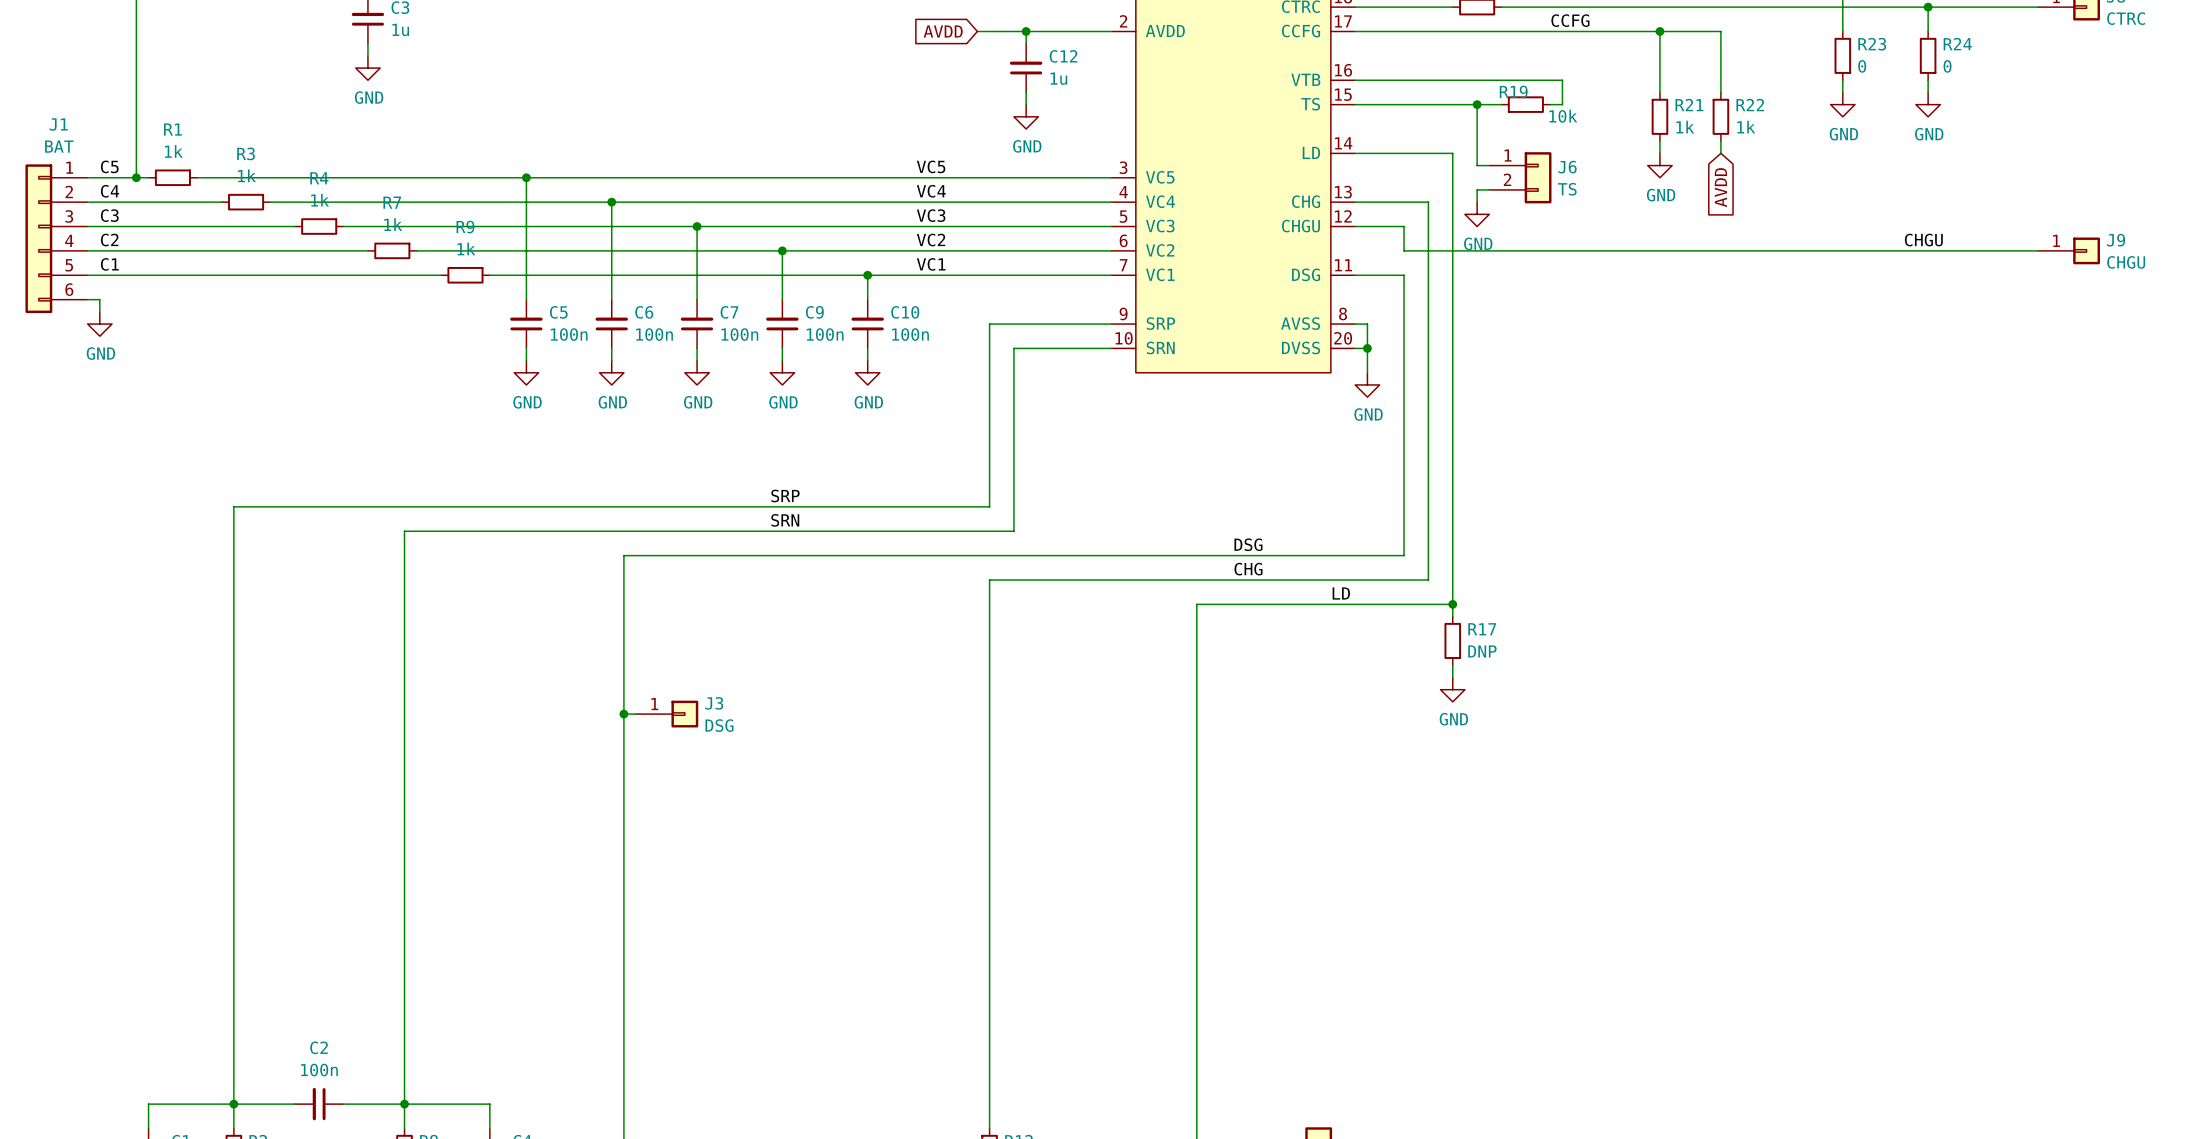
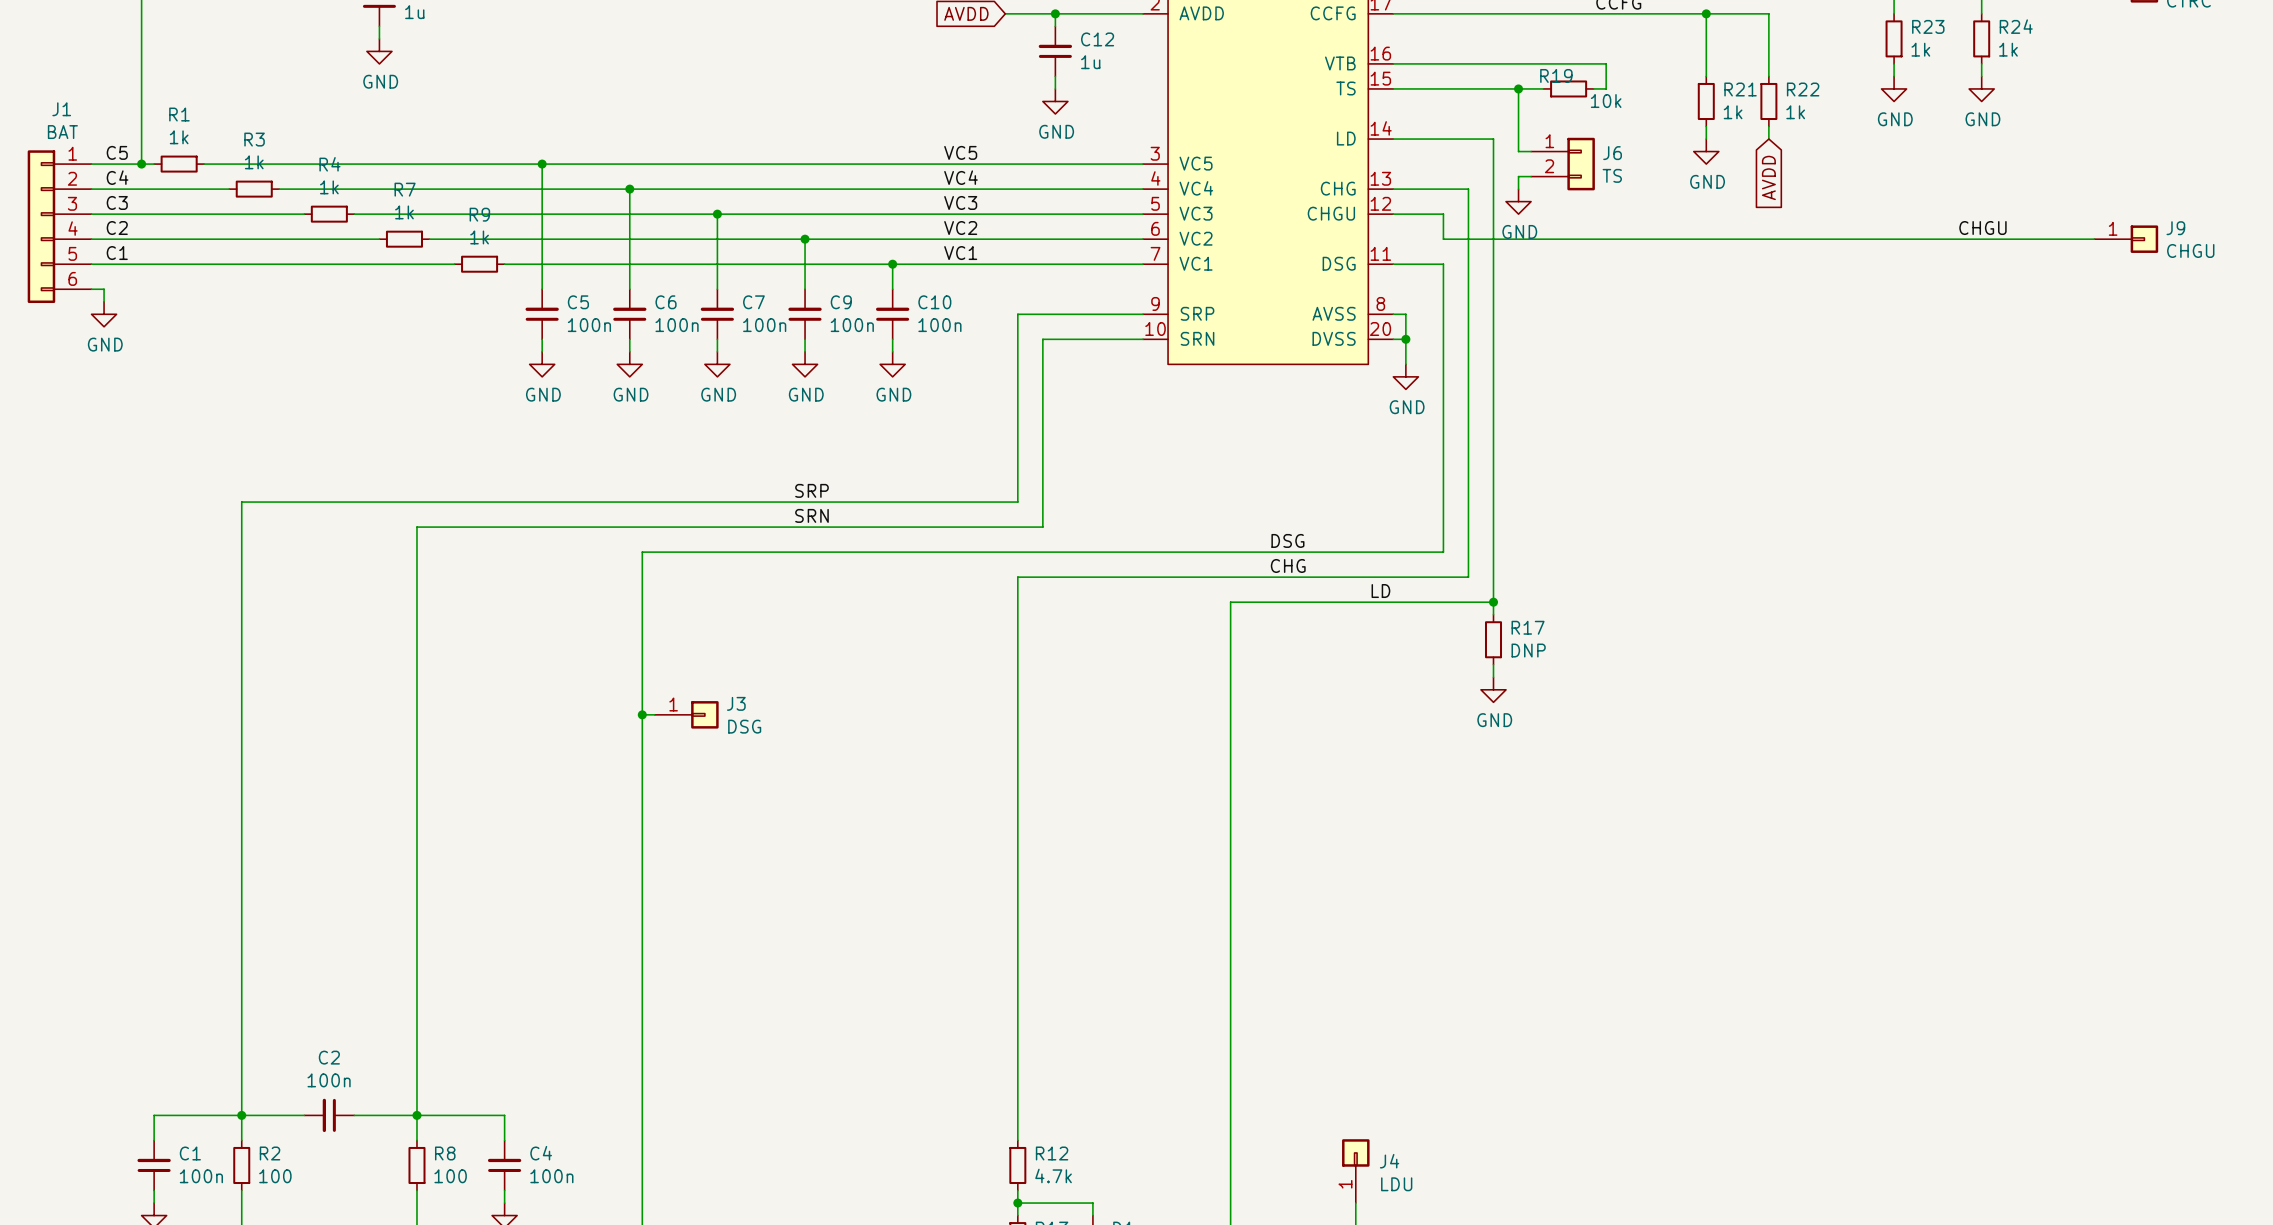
R23 value: 0 (1862, 66) -> 1k (1920, 49)
R24 value: 0 (1947, 66) -> 1k (2008, 49)

